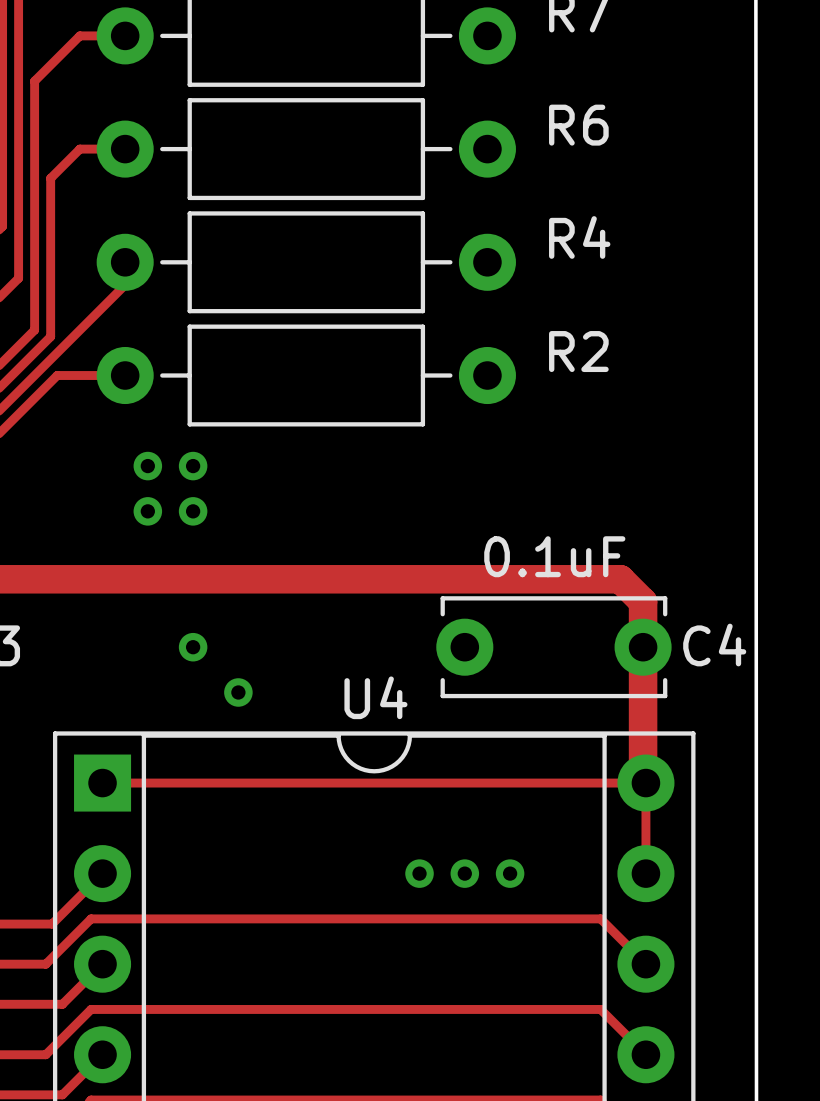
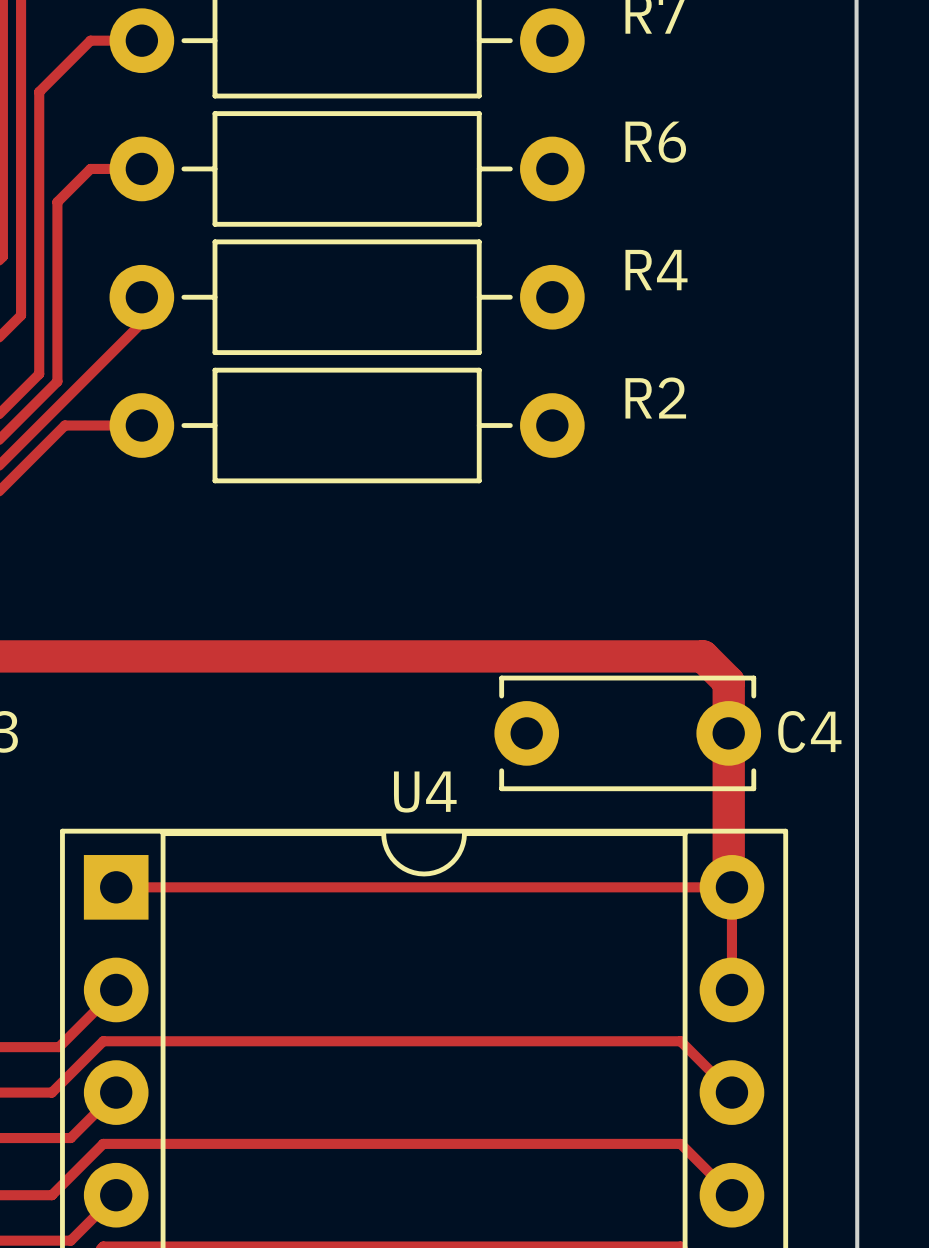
via: (147, 466) -> none
via: (193, 466) -> none
via: (147, 511) -> none
via: (193, 511) -> none
C4 value: 0.1uF (554, 556) -> none
via: (193, 647) -> none
via: (238, 692) -> none
via: (419, 873) -> none
via: (464, 873) -> none
via: (510, 873) -> none

